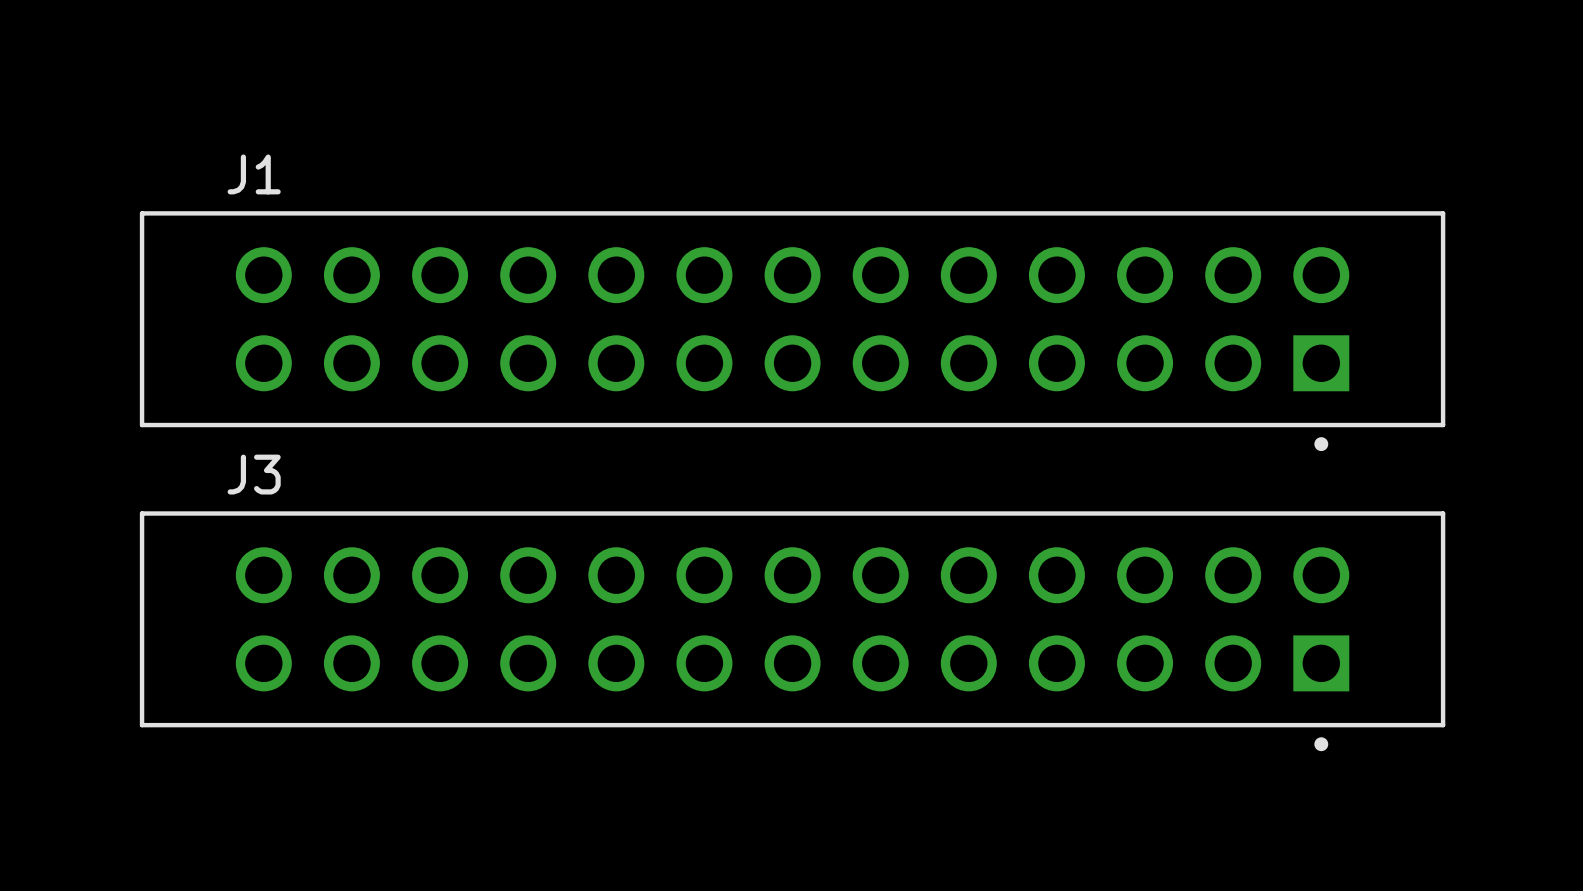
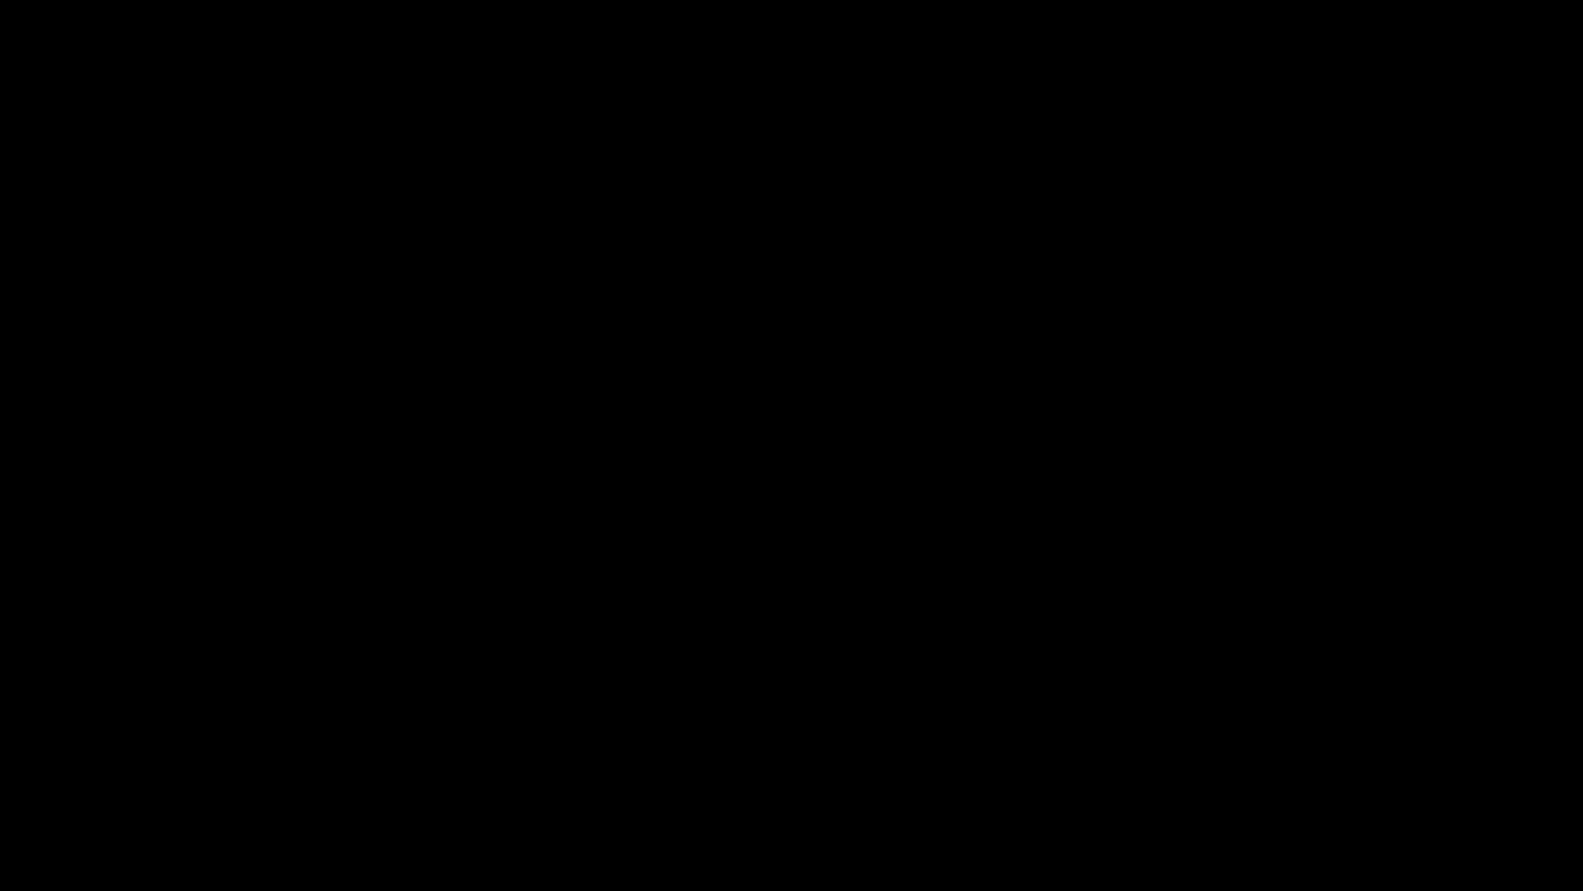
J1: (792, 331) -> none
J3: (792, 631) -> none

